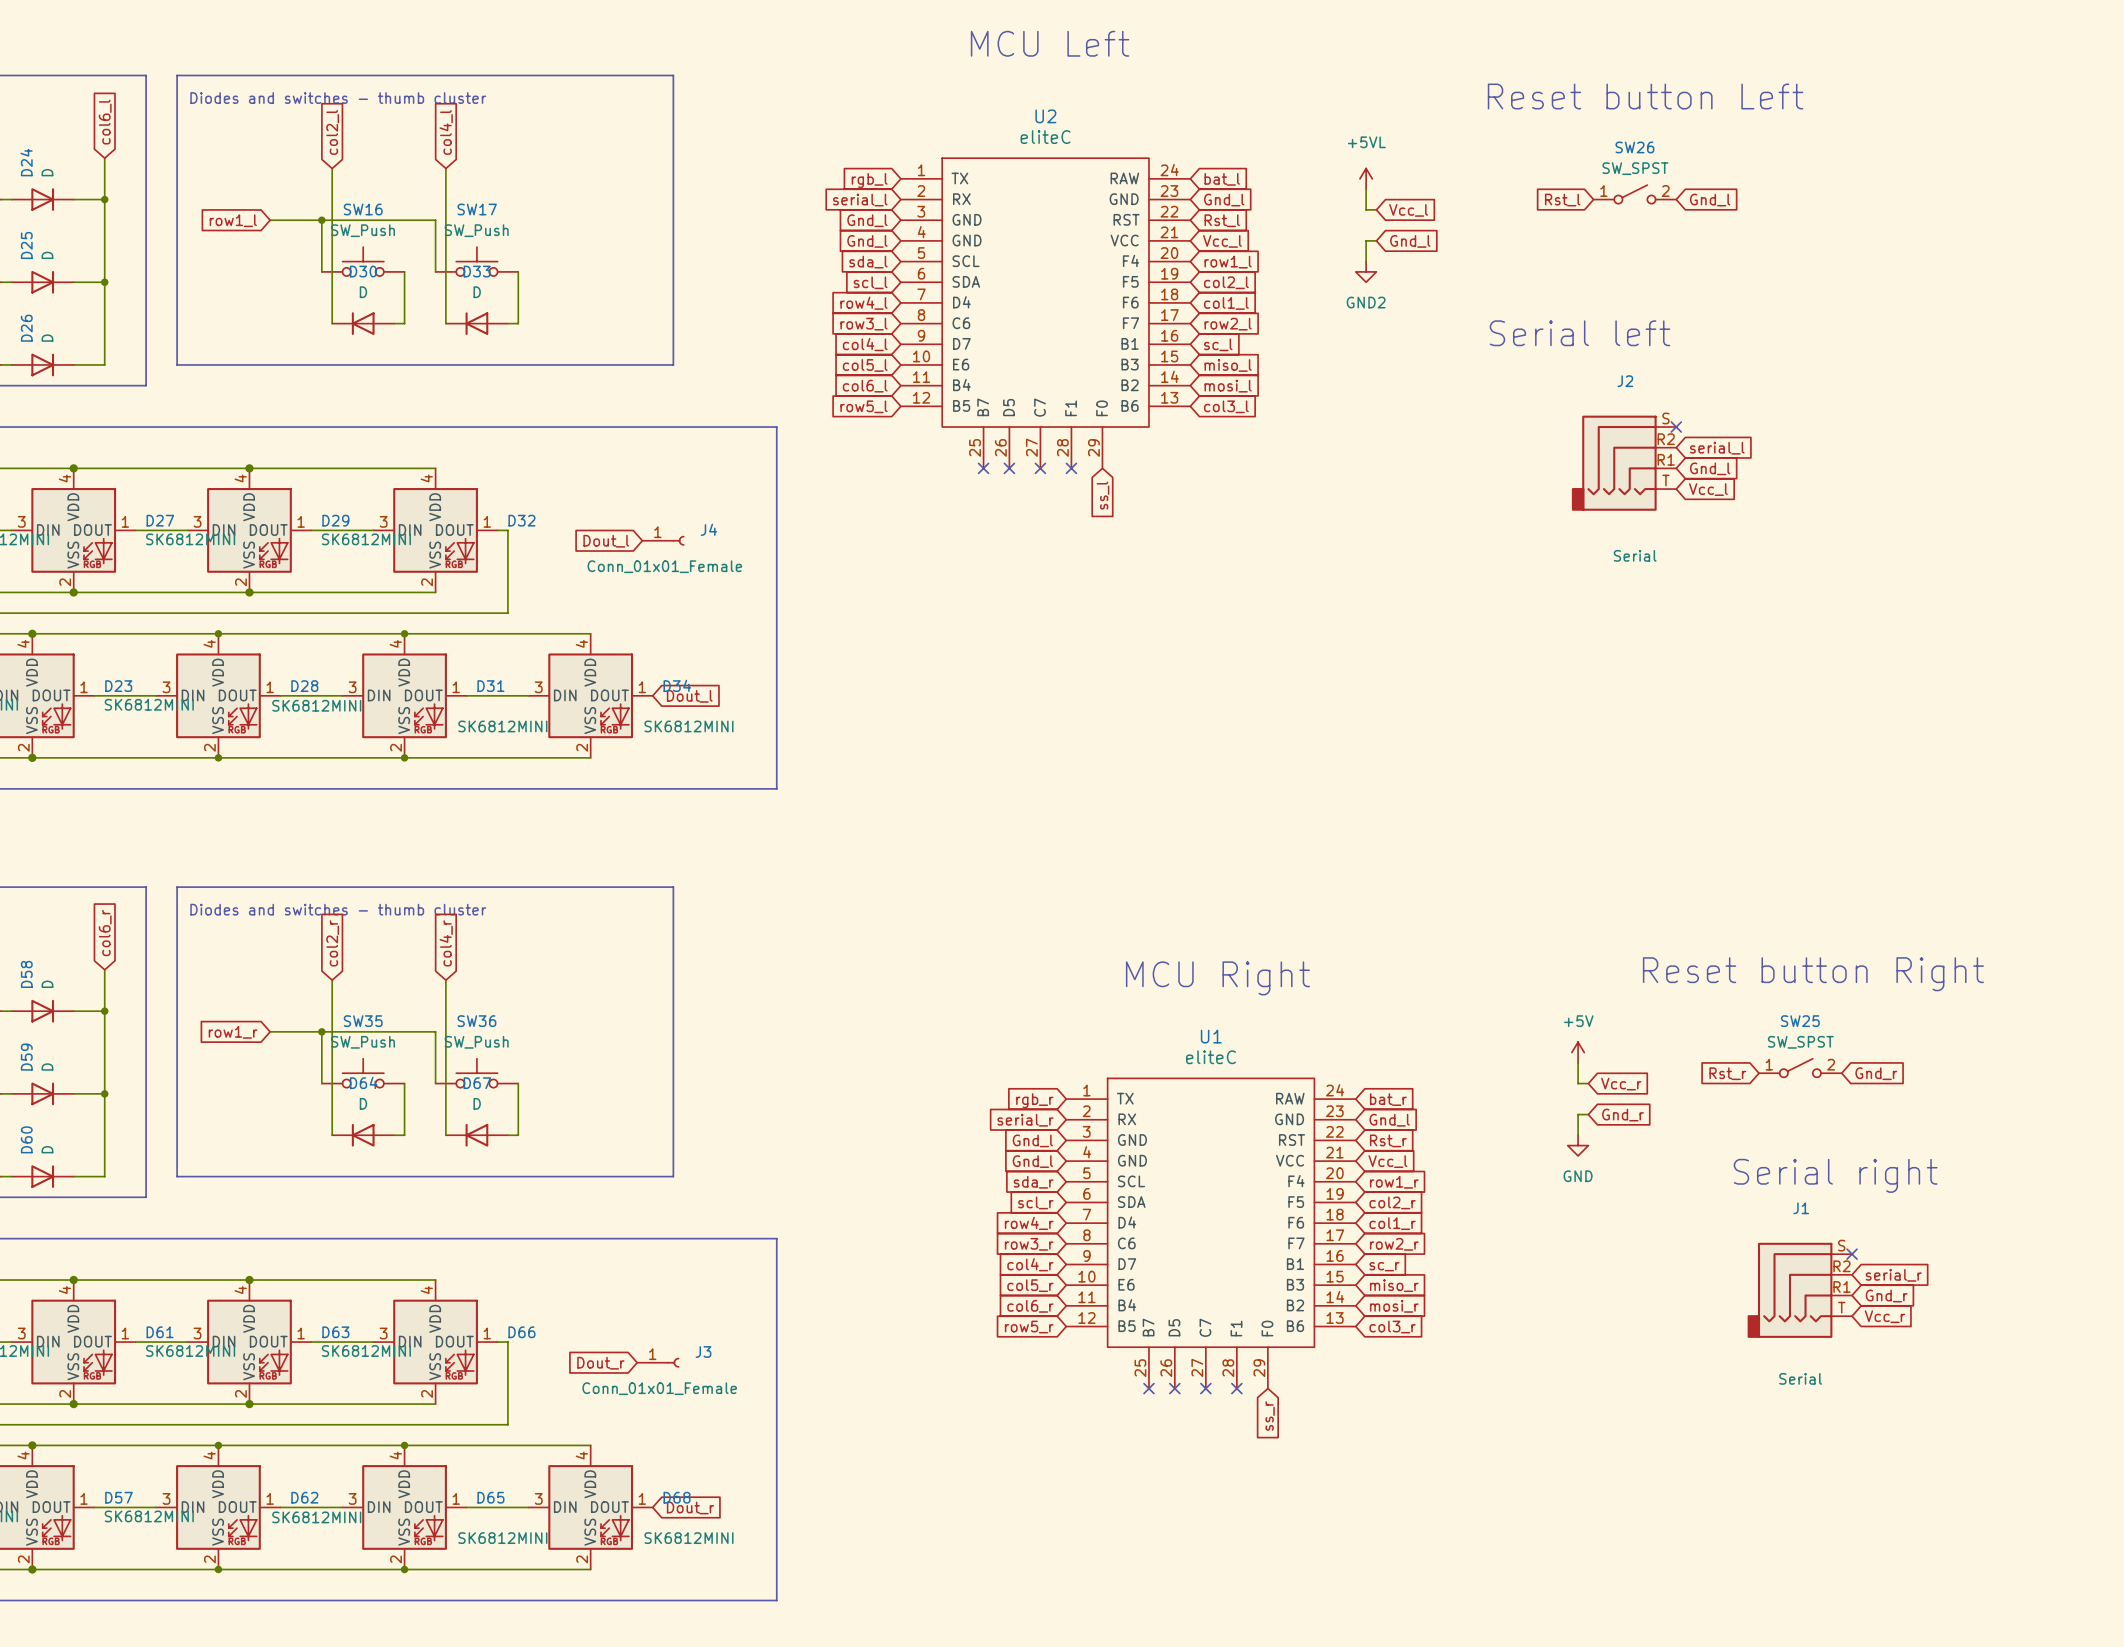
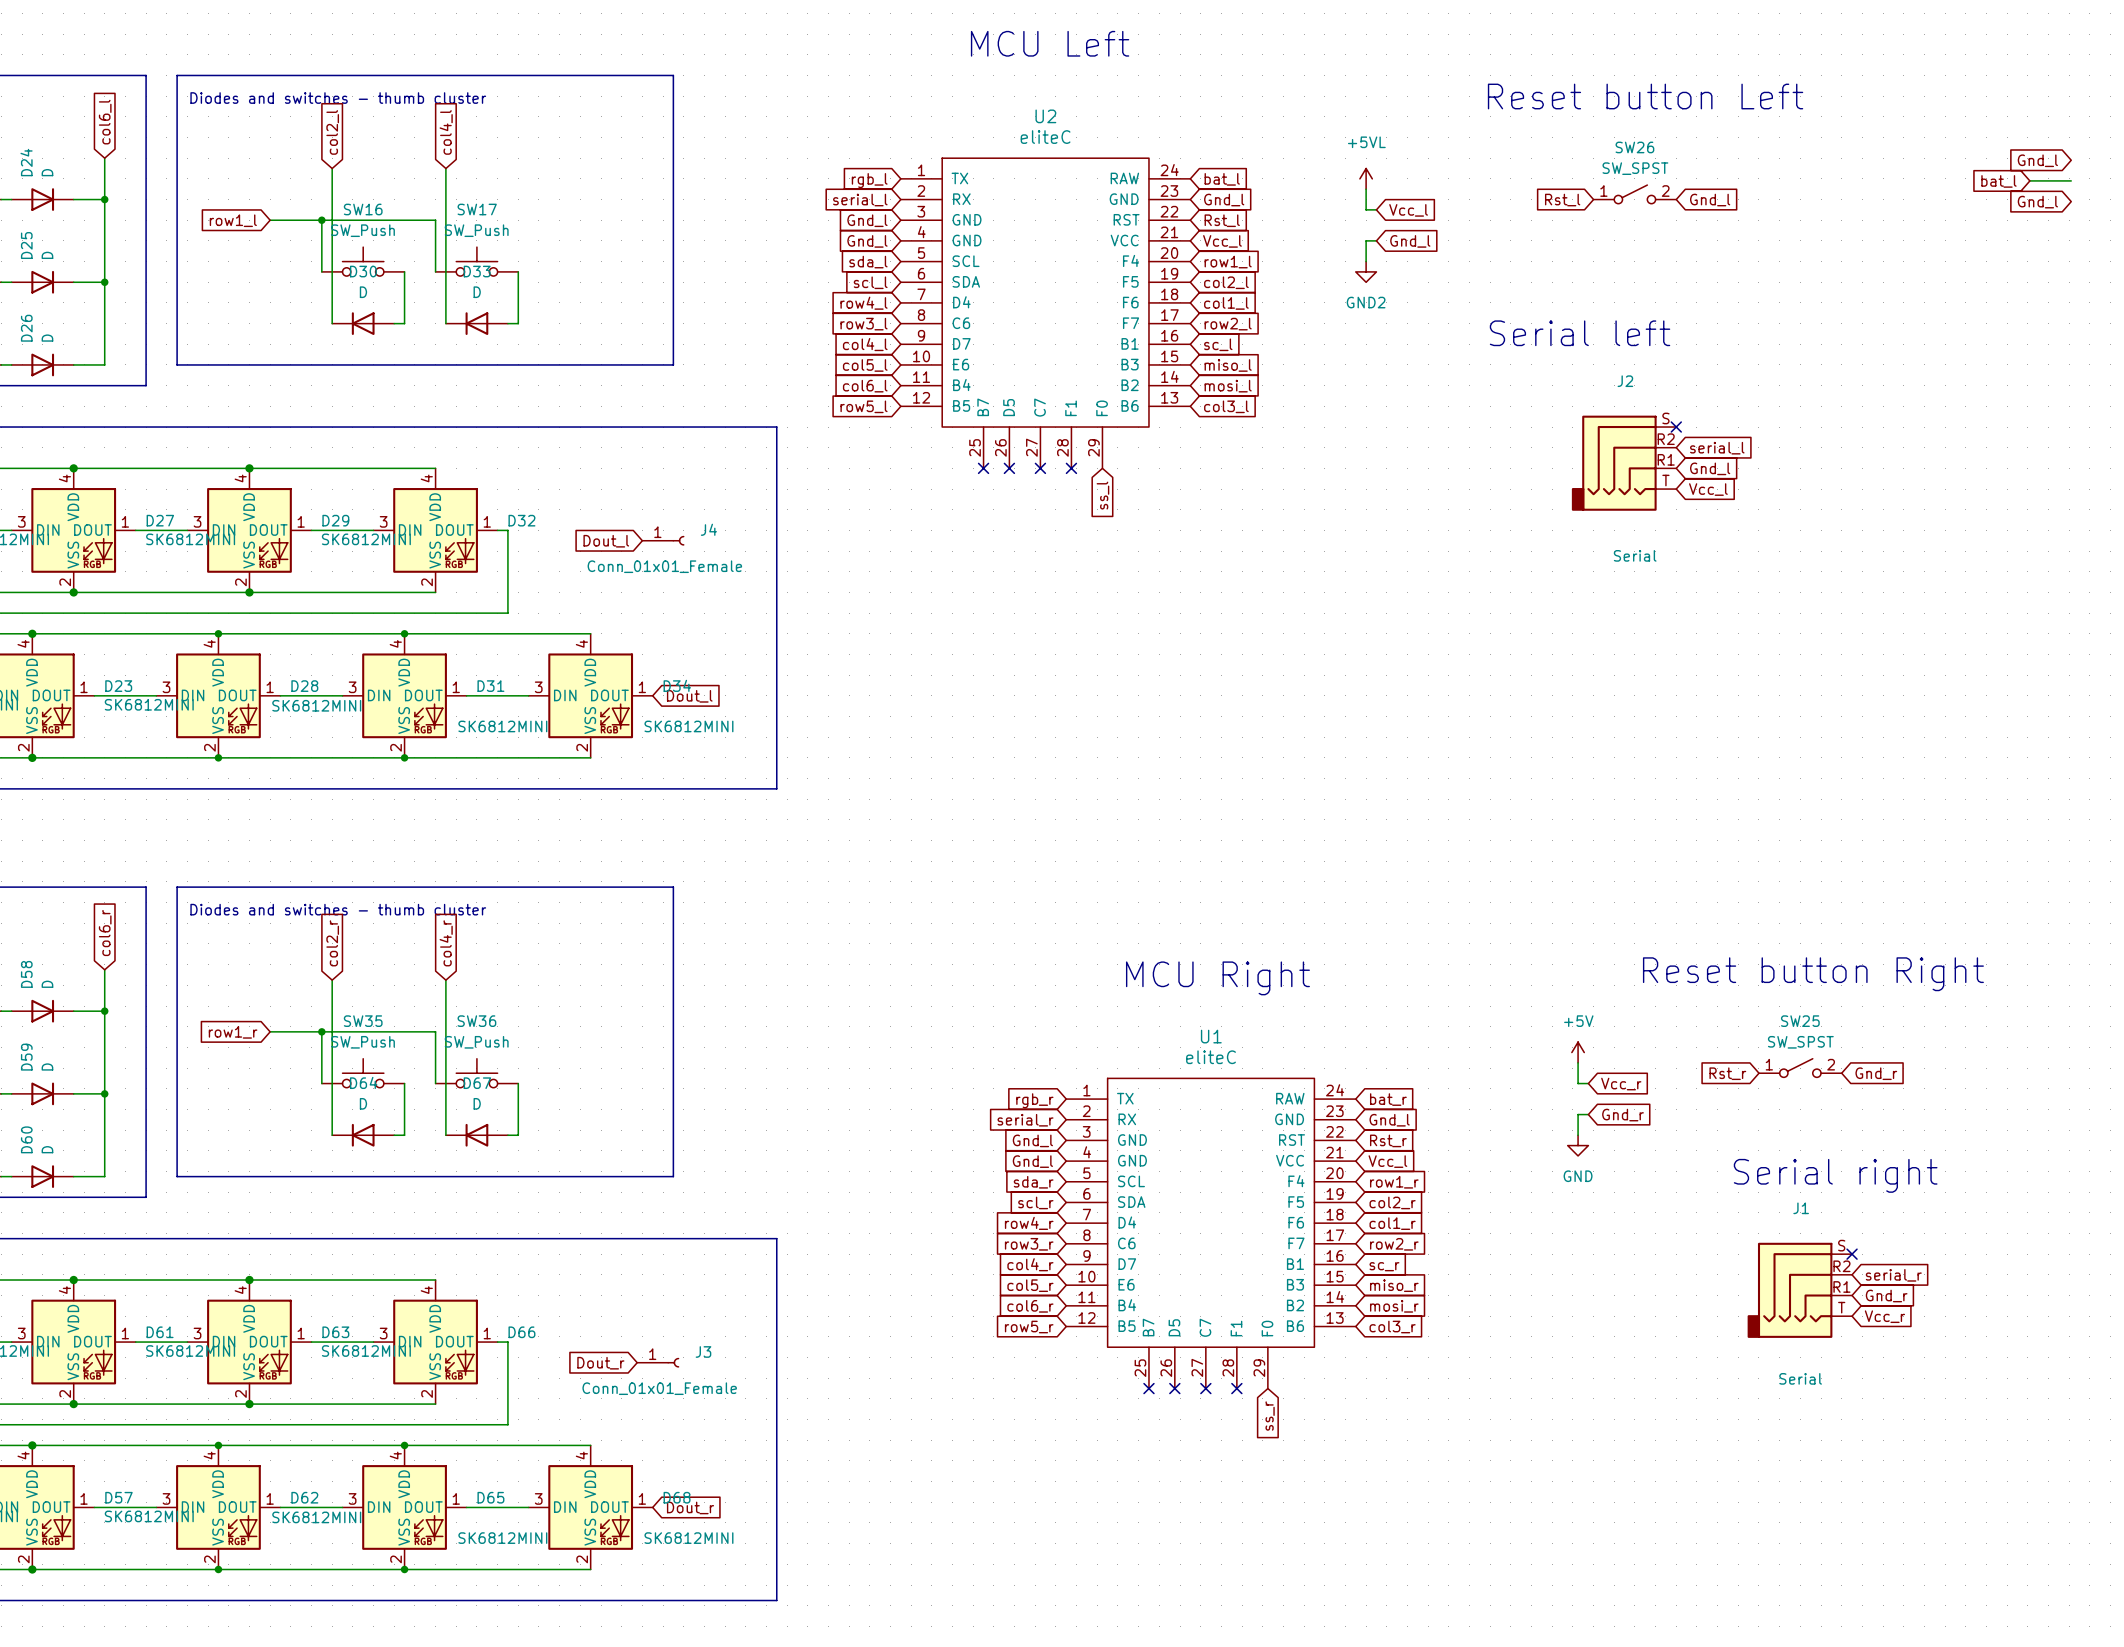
global label: none -> Gnd_l (2037, 160)
wire: none -> (2029, 180) (2071, 180)
global label: none -> bat_l (1998, 181)
global label: none -> Gnd_l (2037, 202)

